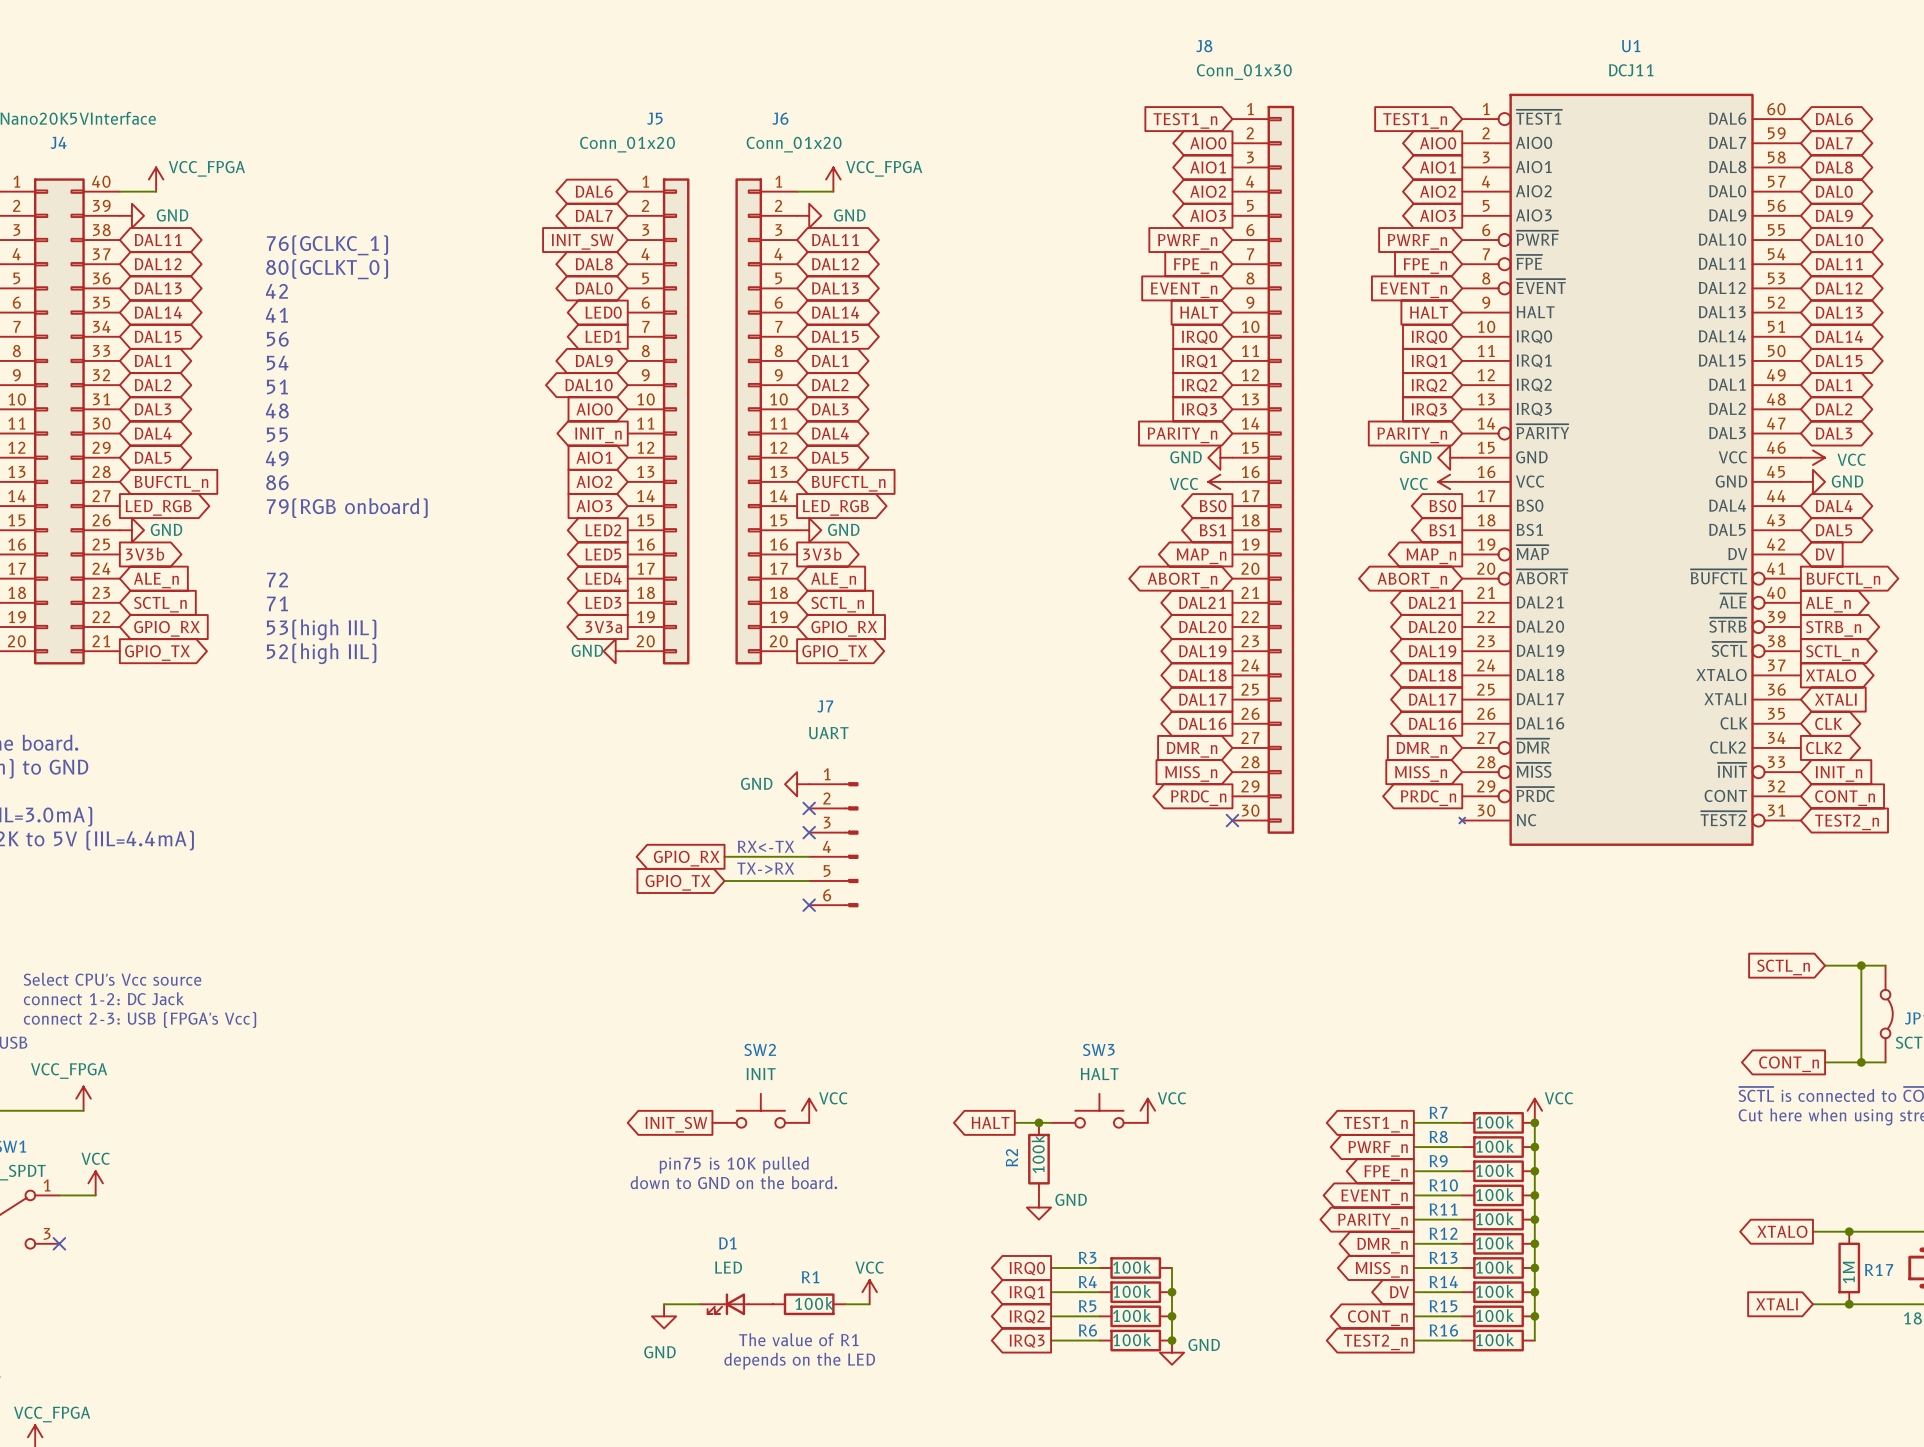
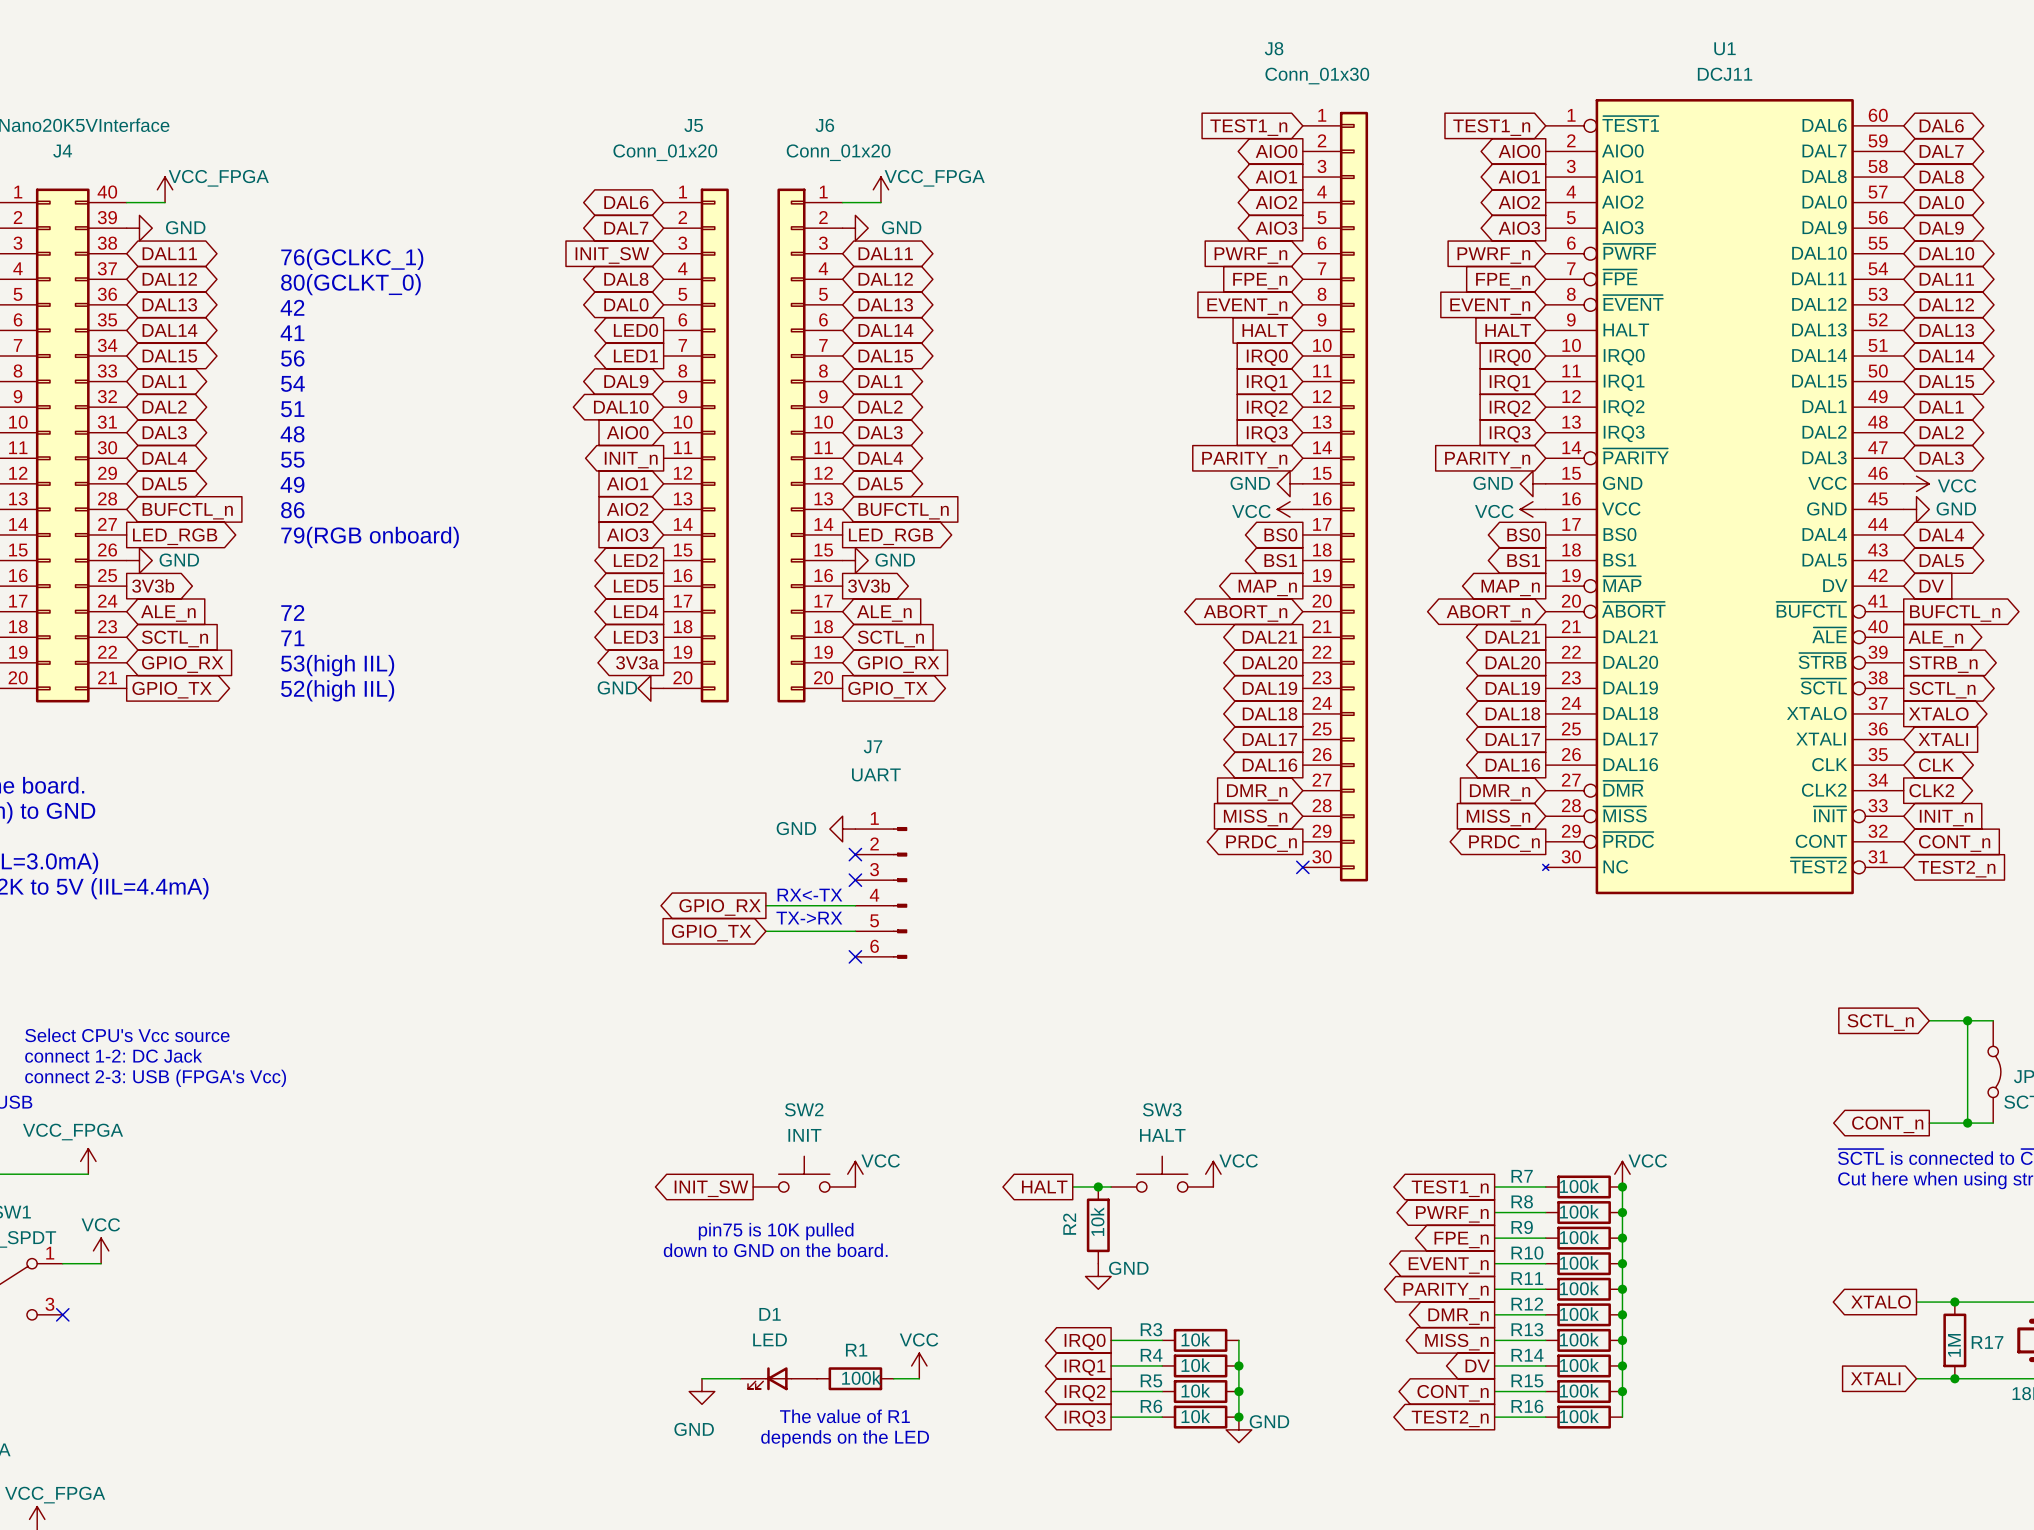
R2 value: 100k (1038, 1154) -> 10k (1097, 1221)
R3 value: 100k (1132, 1267) -> 10k (1195, 1339)
R4 value: 100k (1132, 1291) -> 10k (1195, 1365)
R5 value: 100k (1132, 1315) -> 10k (1195, 1390)
R6 value: 100k (1132, 1339) -> 10k (1195, 1416)

